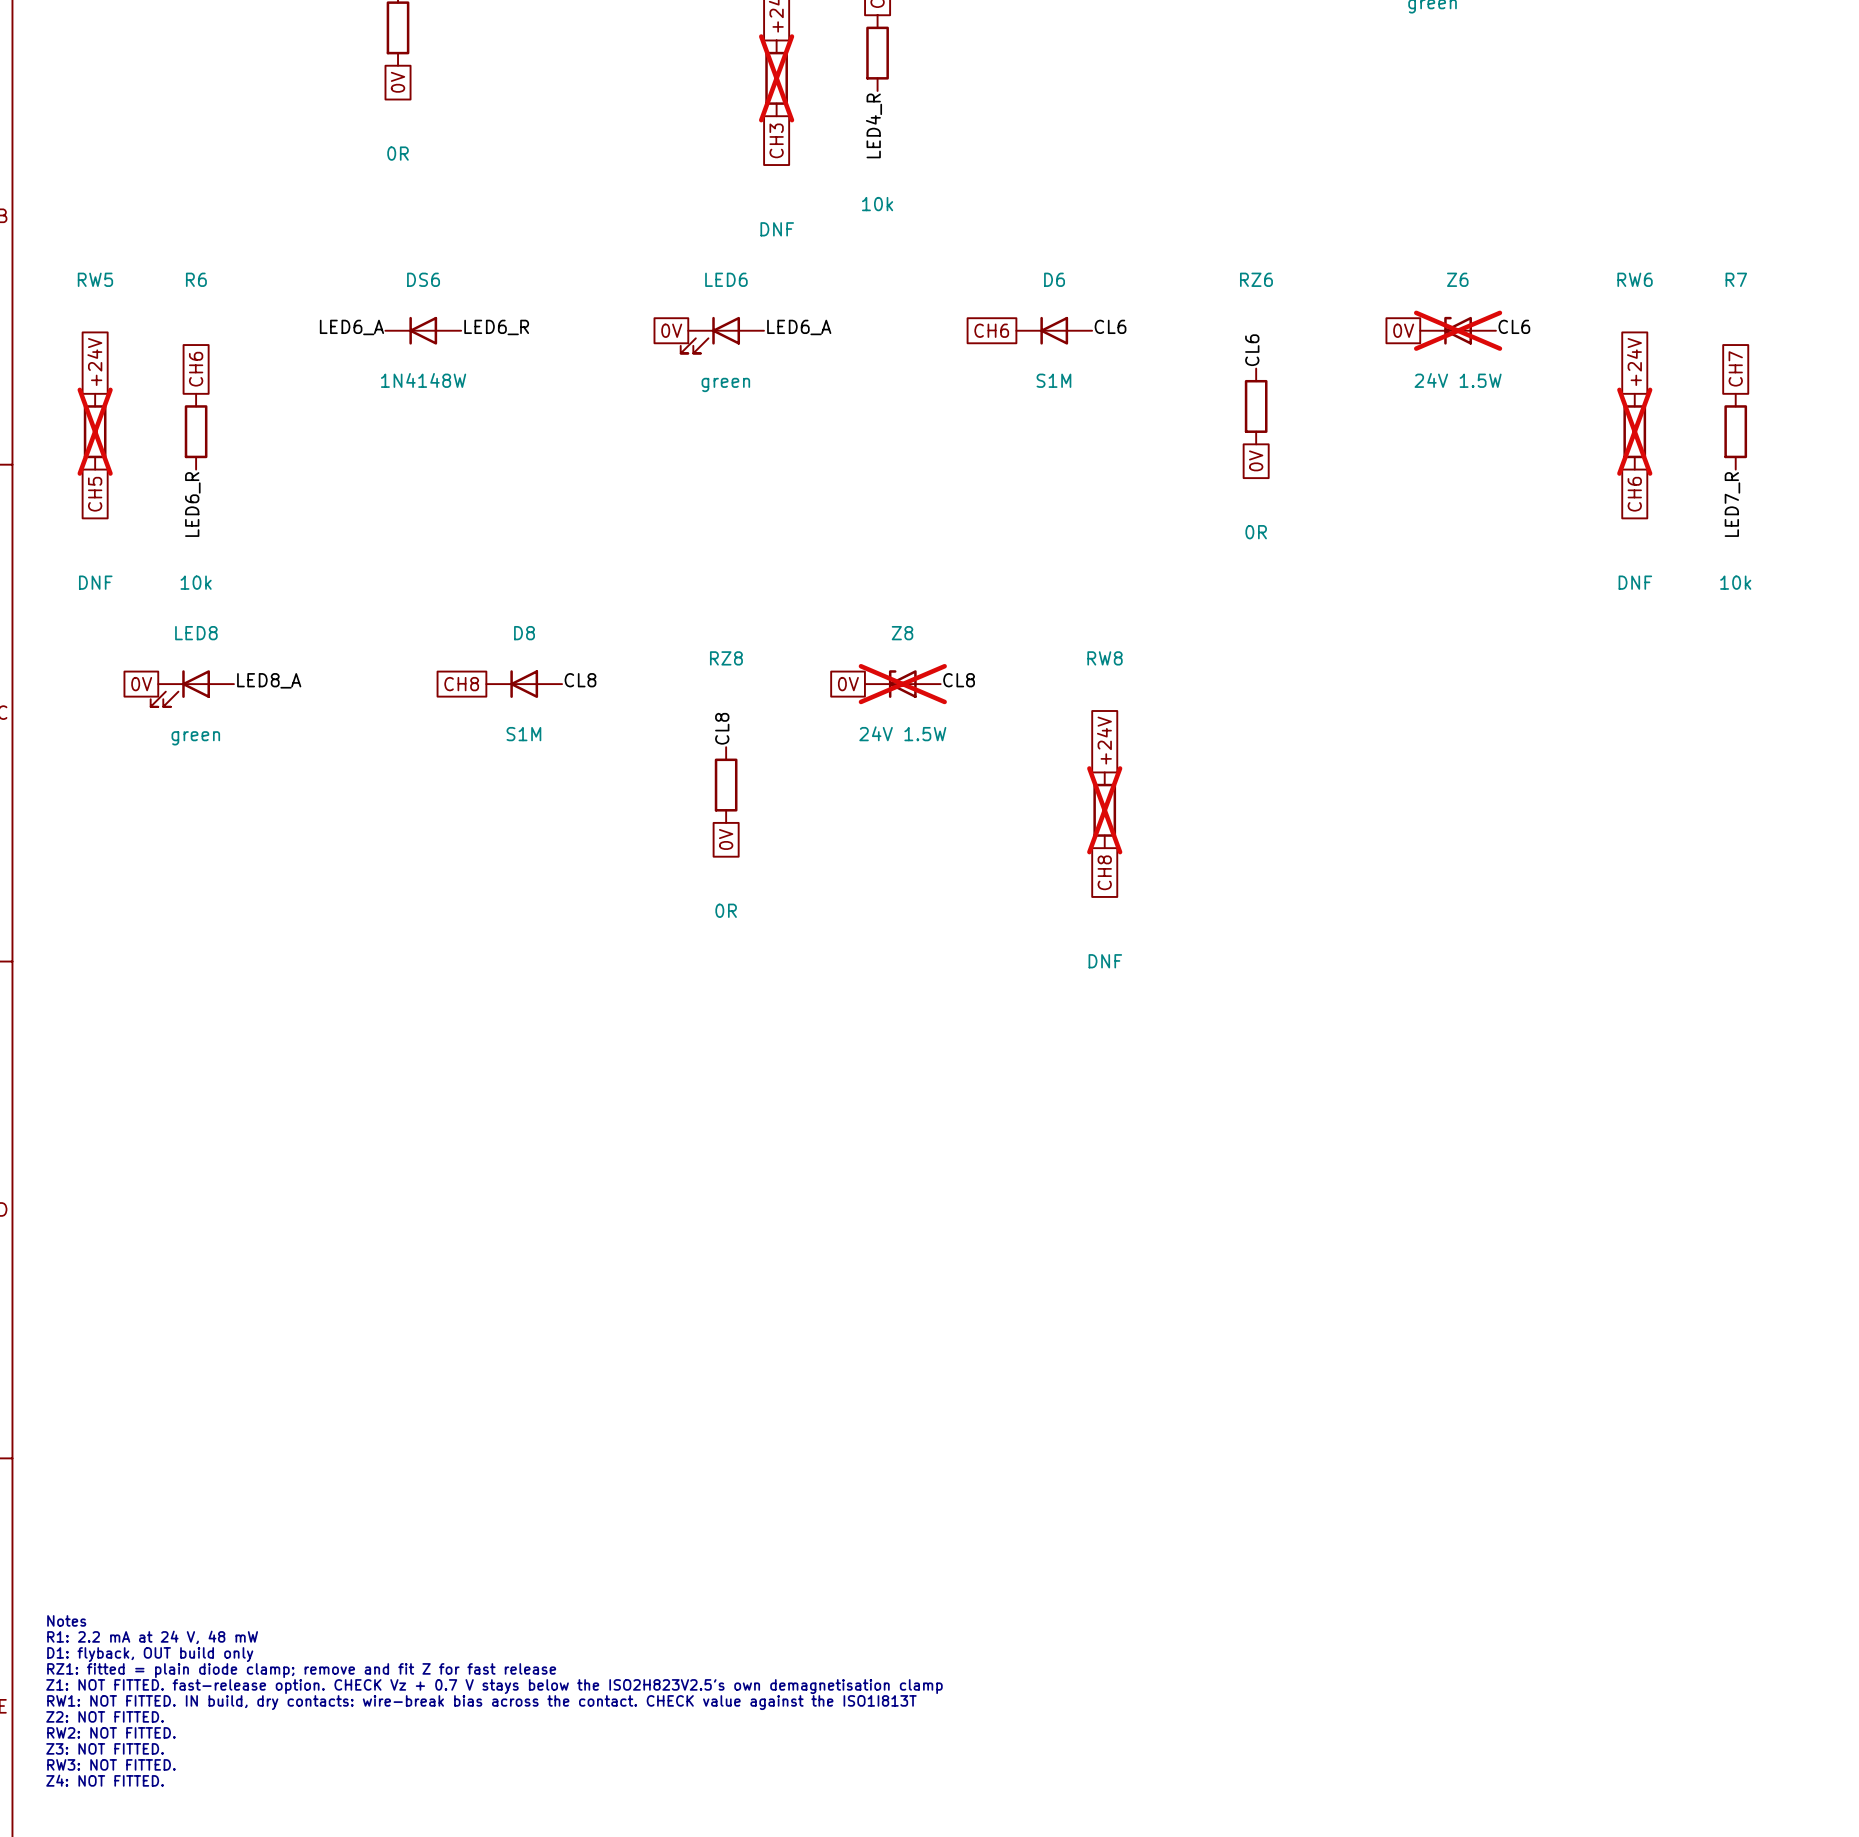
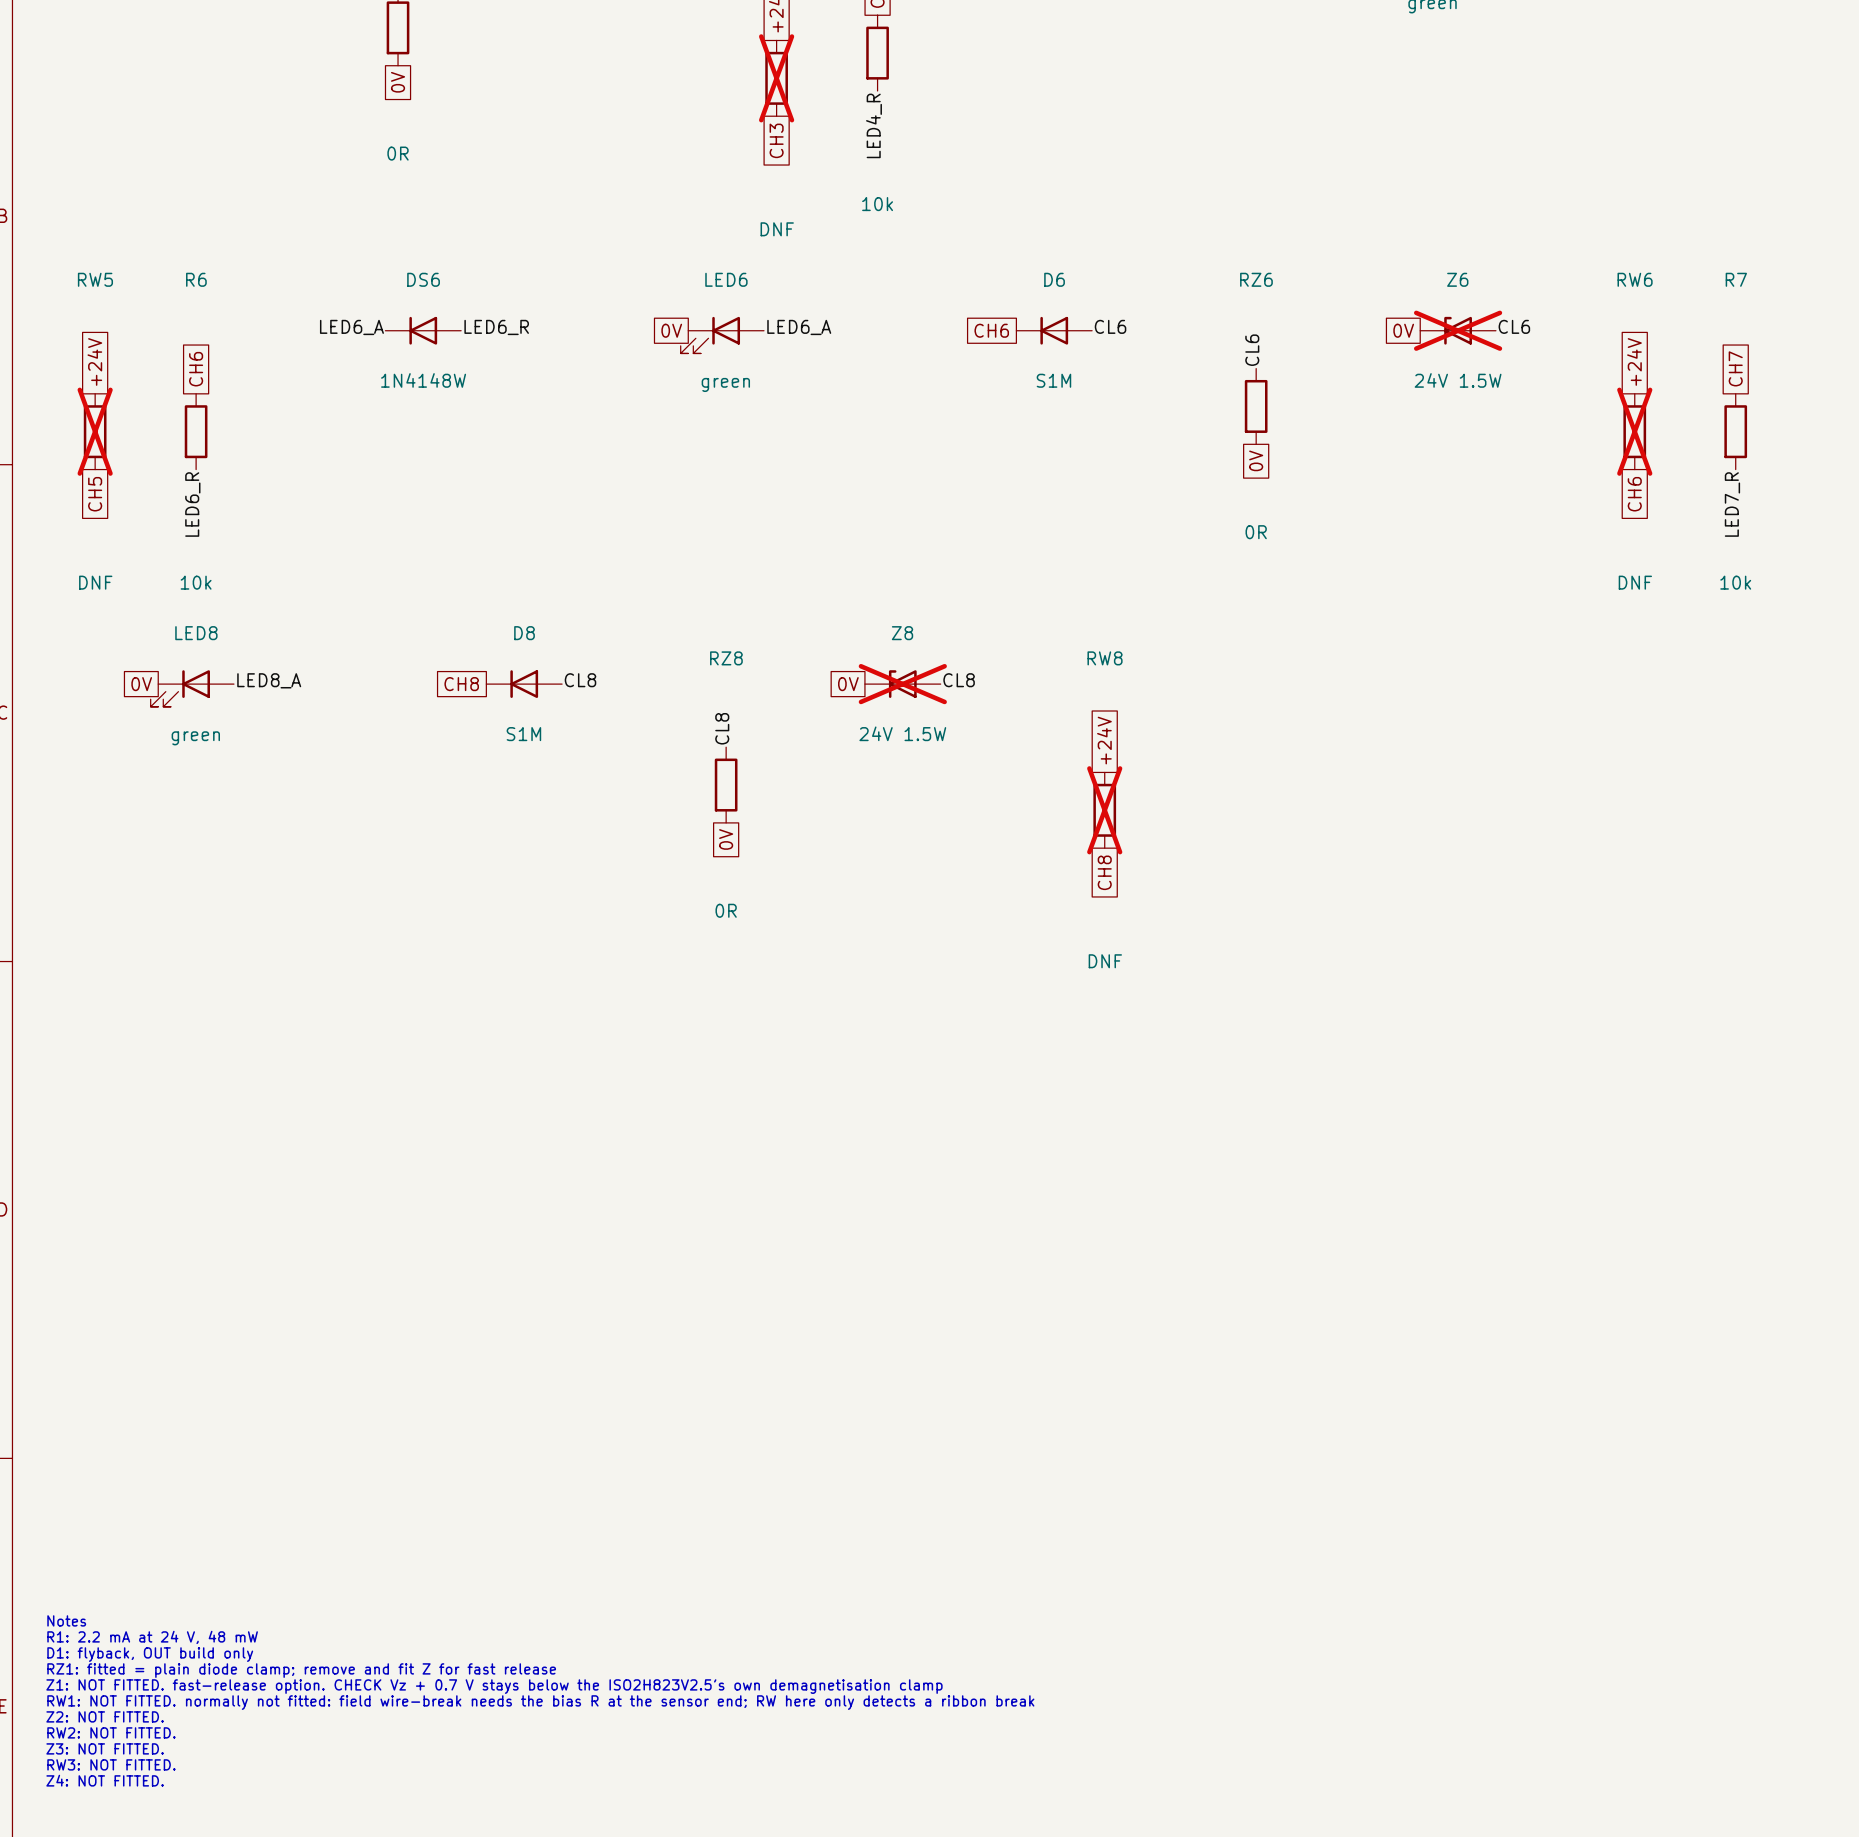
text: RW1: NOT FITTED. IN build, dry contacts: wire-break bias across the contact. CHECK value against the ISO1I813T (481, 1702) -> RW1: NOT FITTED. normally not fitted: field wire-break needs the bias R at the sensor end; RW here only detects a ribbon break (540, 1702)

